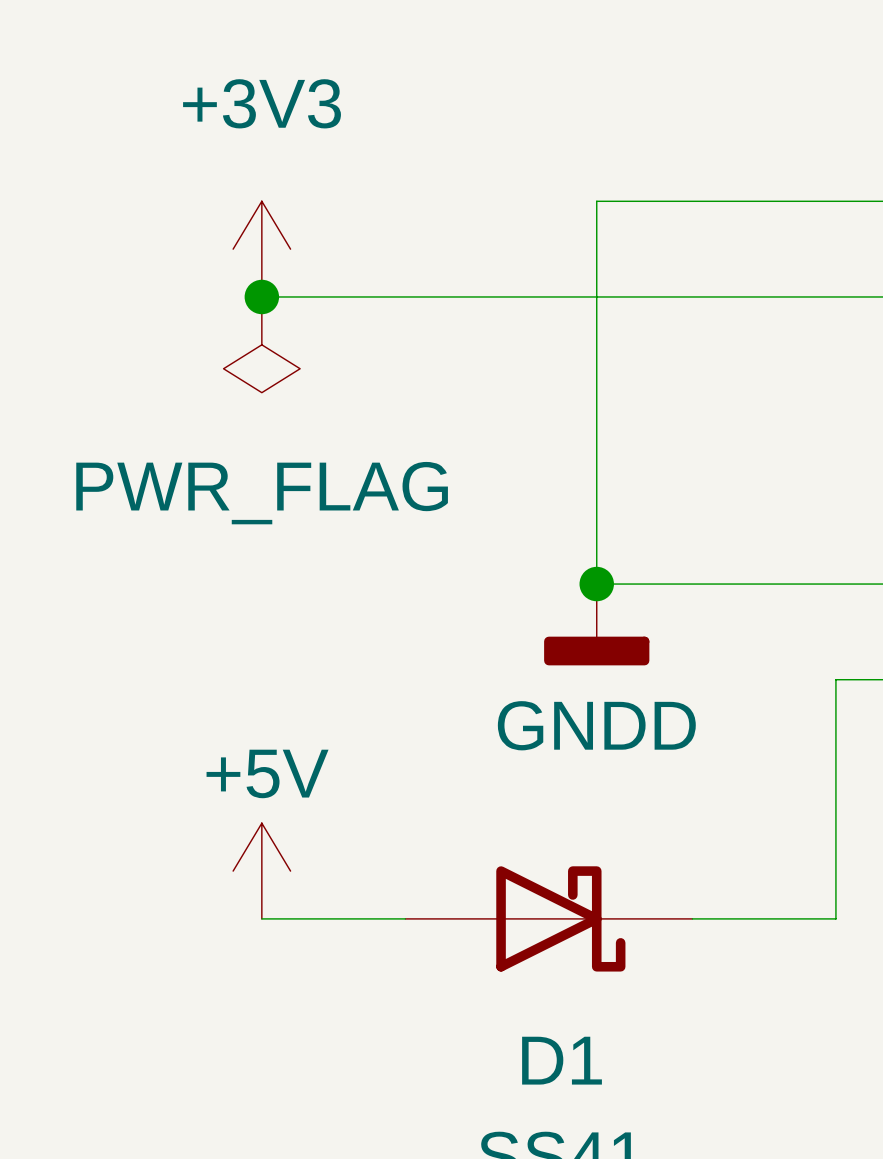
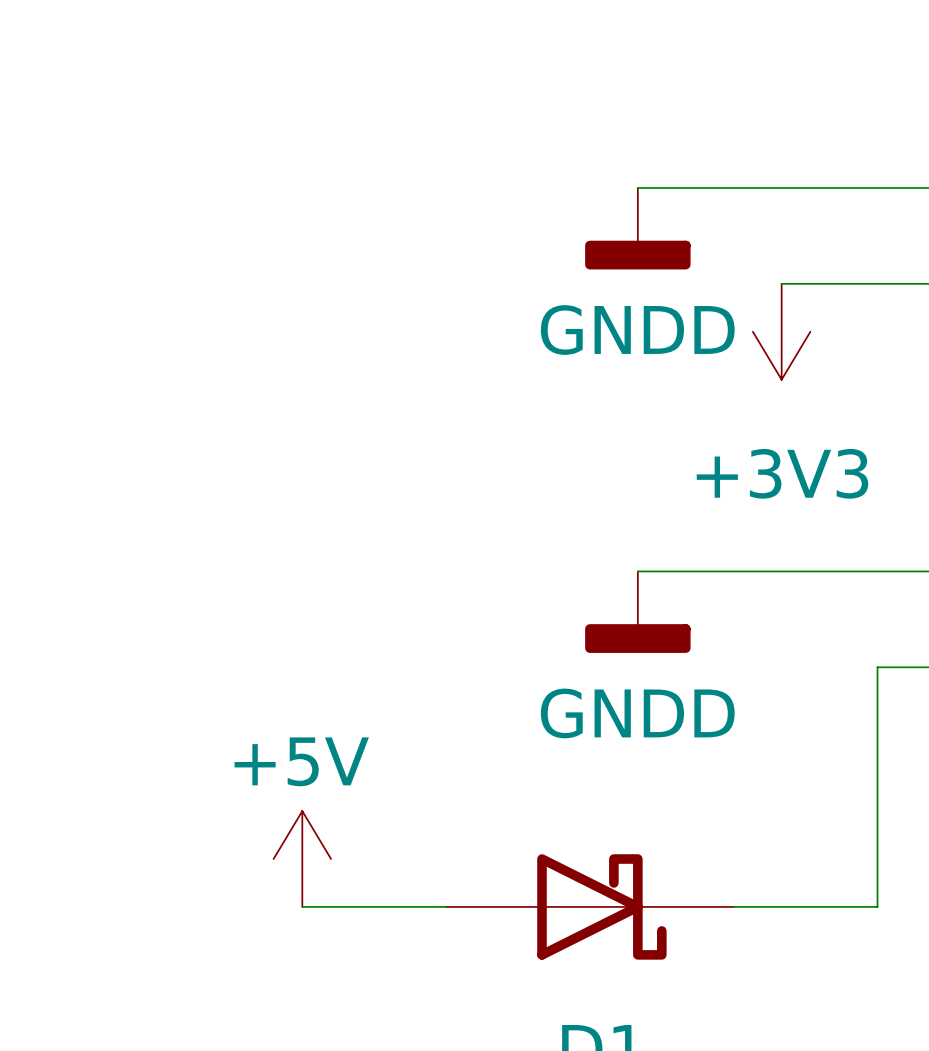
wire: (596, 201) (596, 584) -> none
power symbol: none -> GNDD (637, 228)
power symbol rotation: 0° (261, 249) -> 180° (781, 331)
power symbol position: +3V3 (261, 249) -> +3V3 (781, 331)
wire: (261, 296) (740, 296) -> none
junction: (261, 296) -> none
power symbol: PWR_FLAG (261, 344) -> none
junction: (596, 584) -> none

